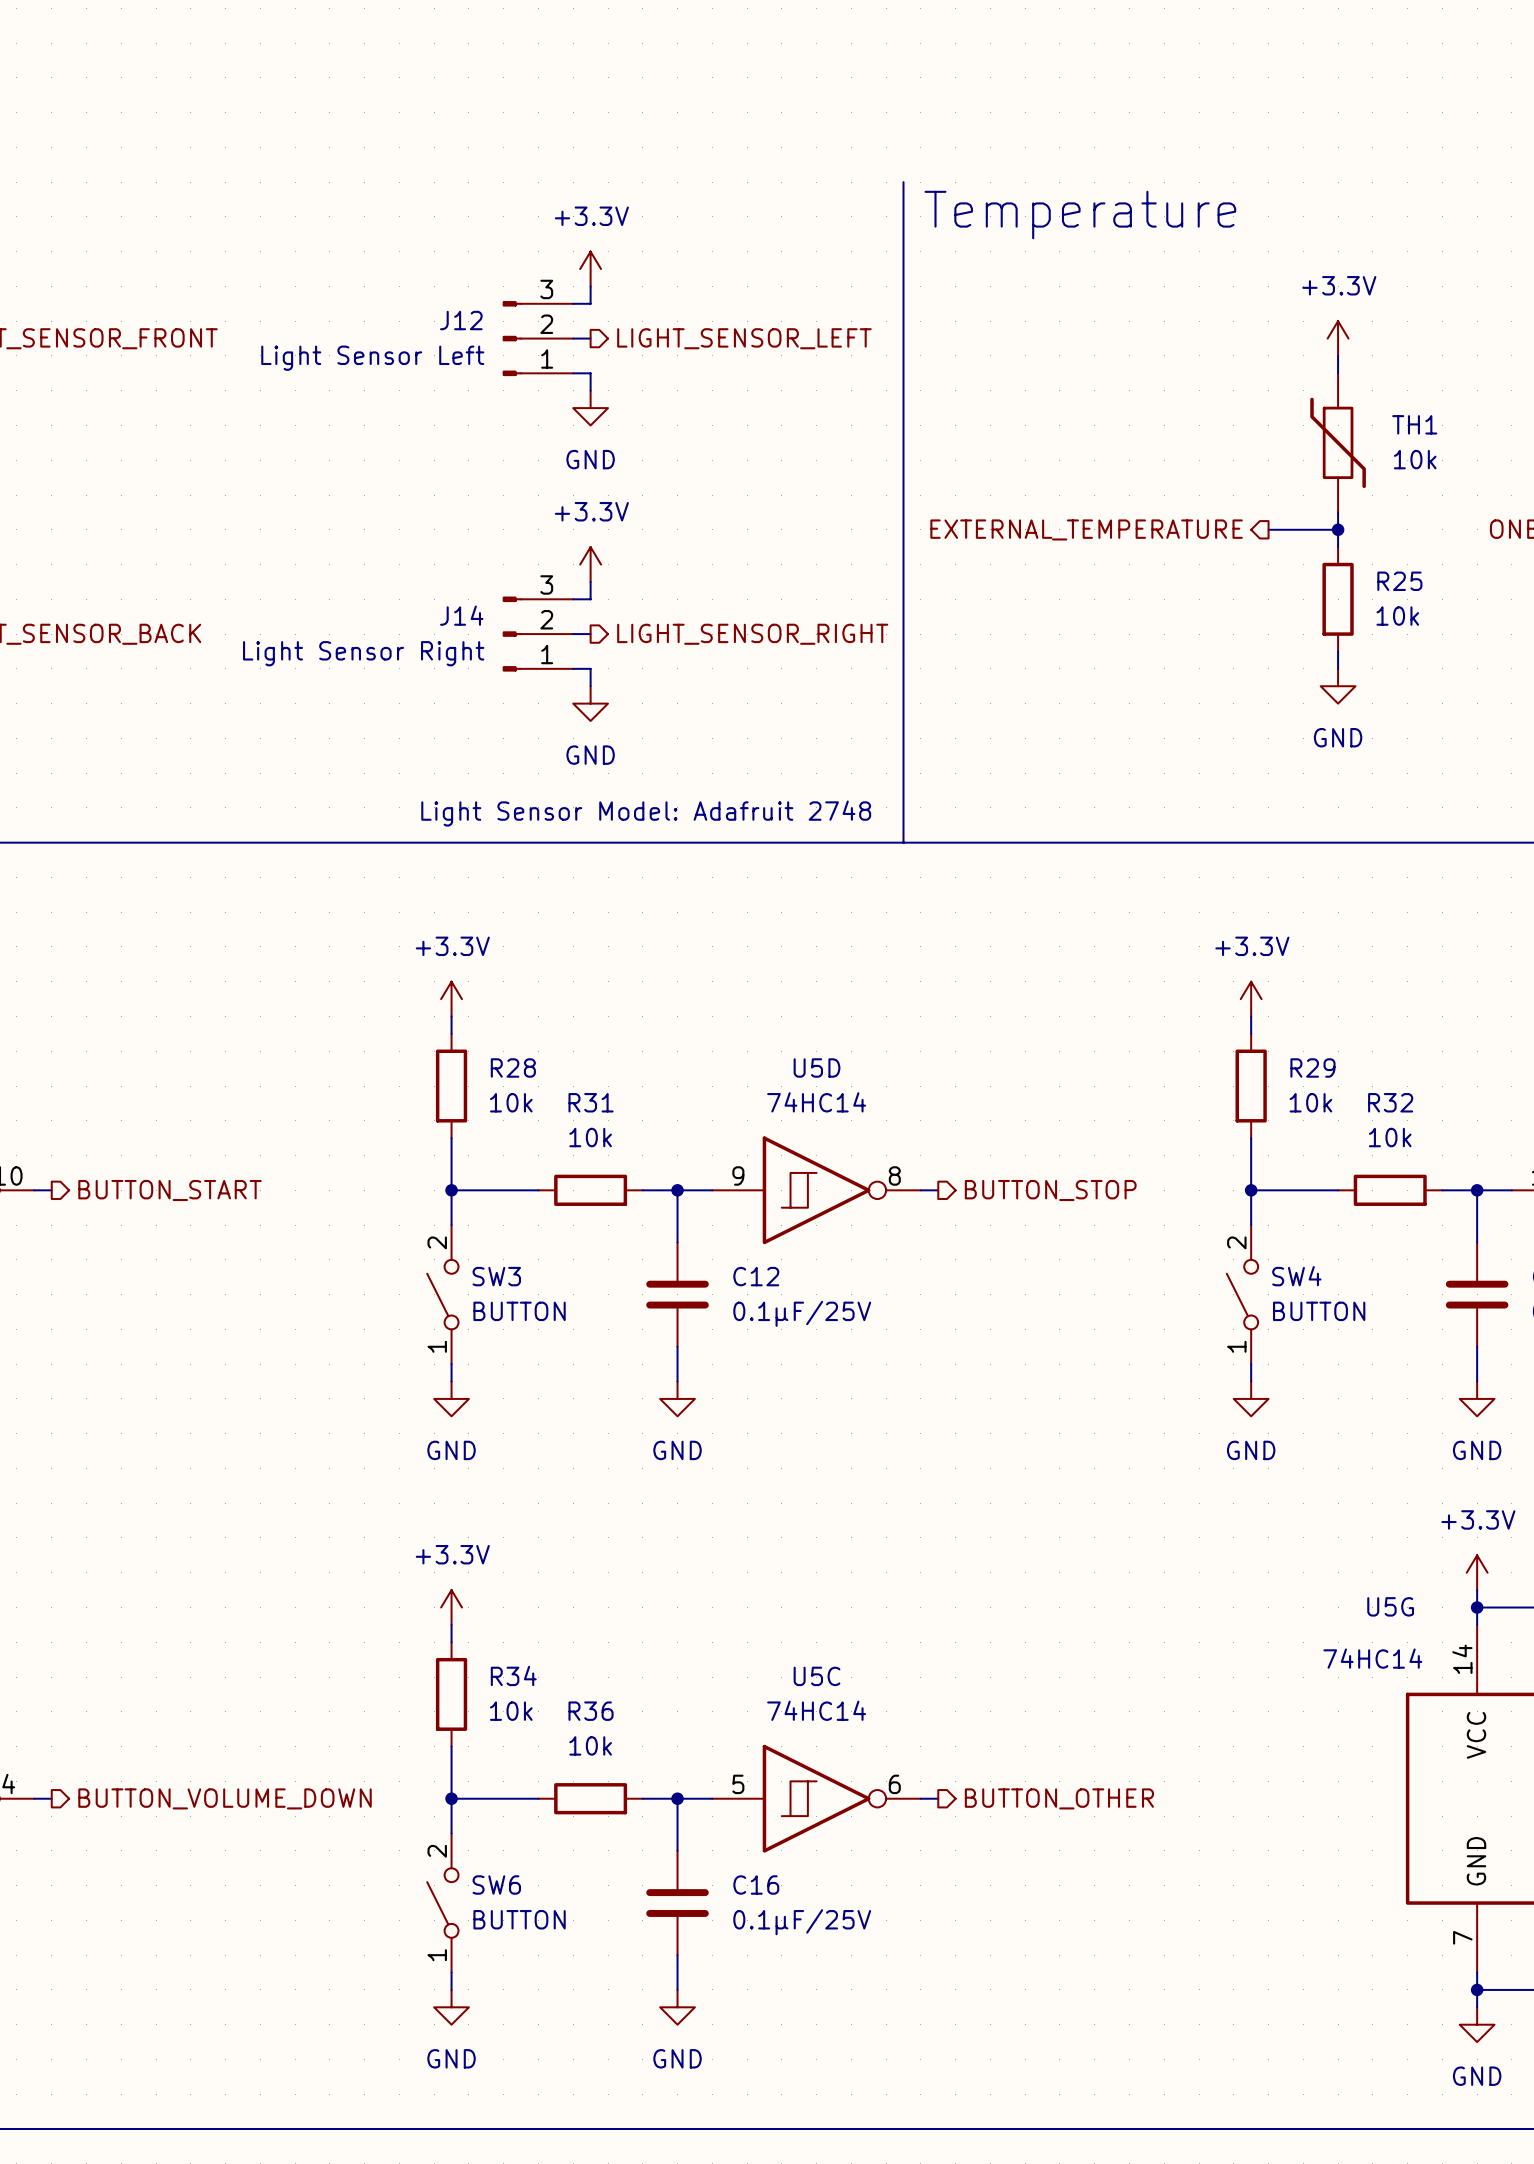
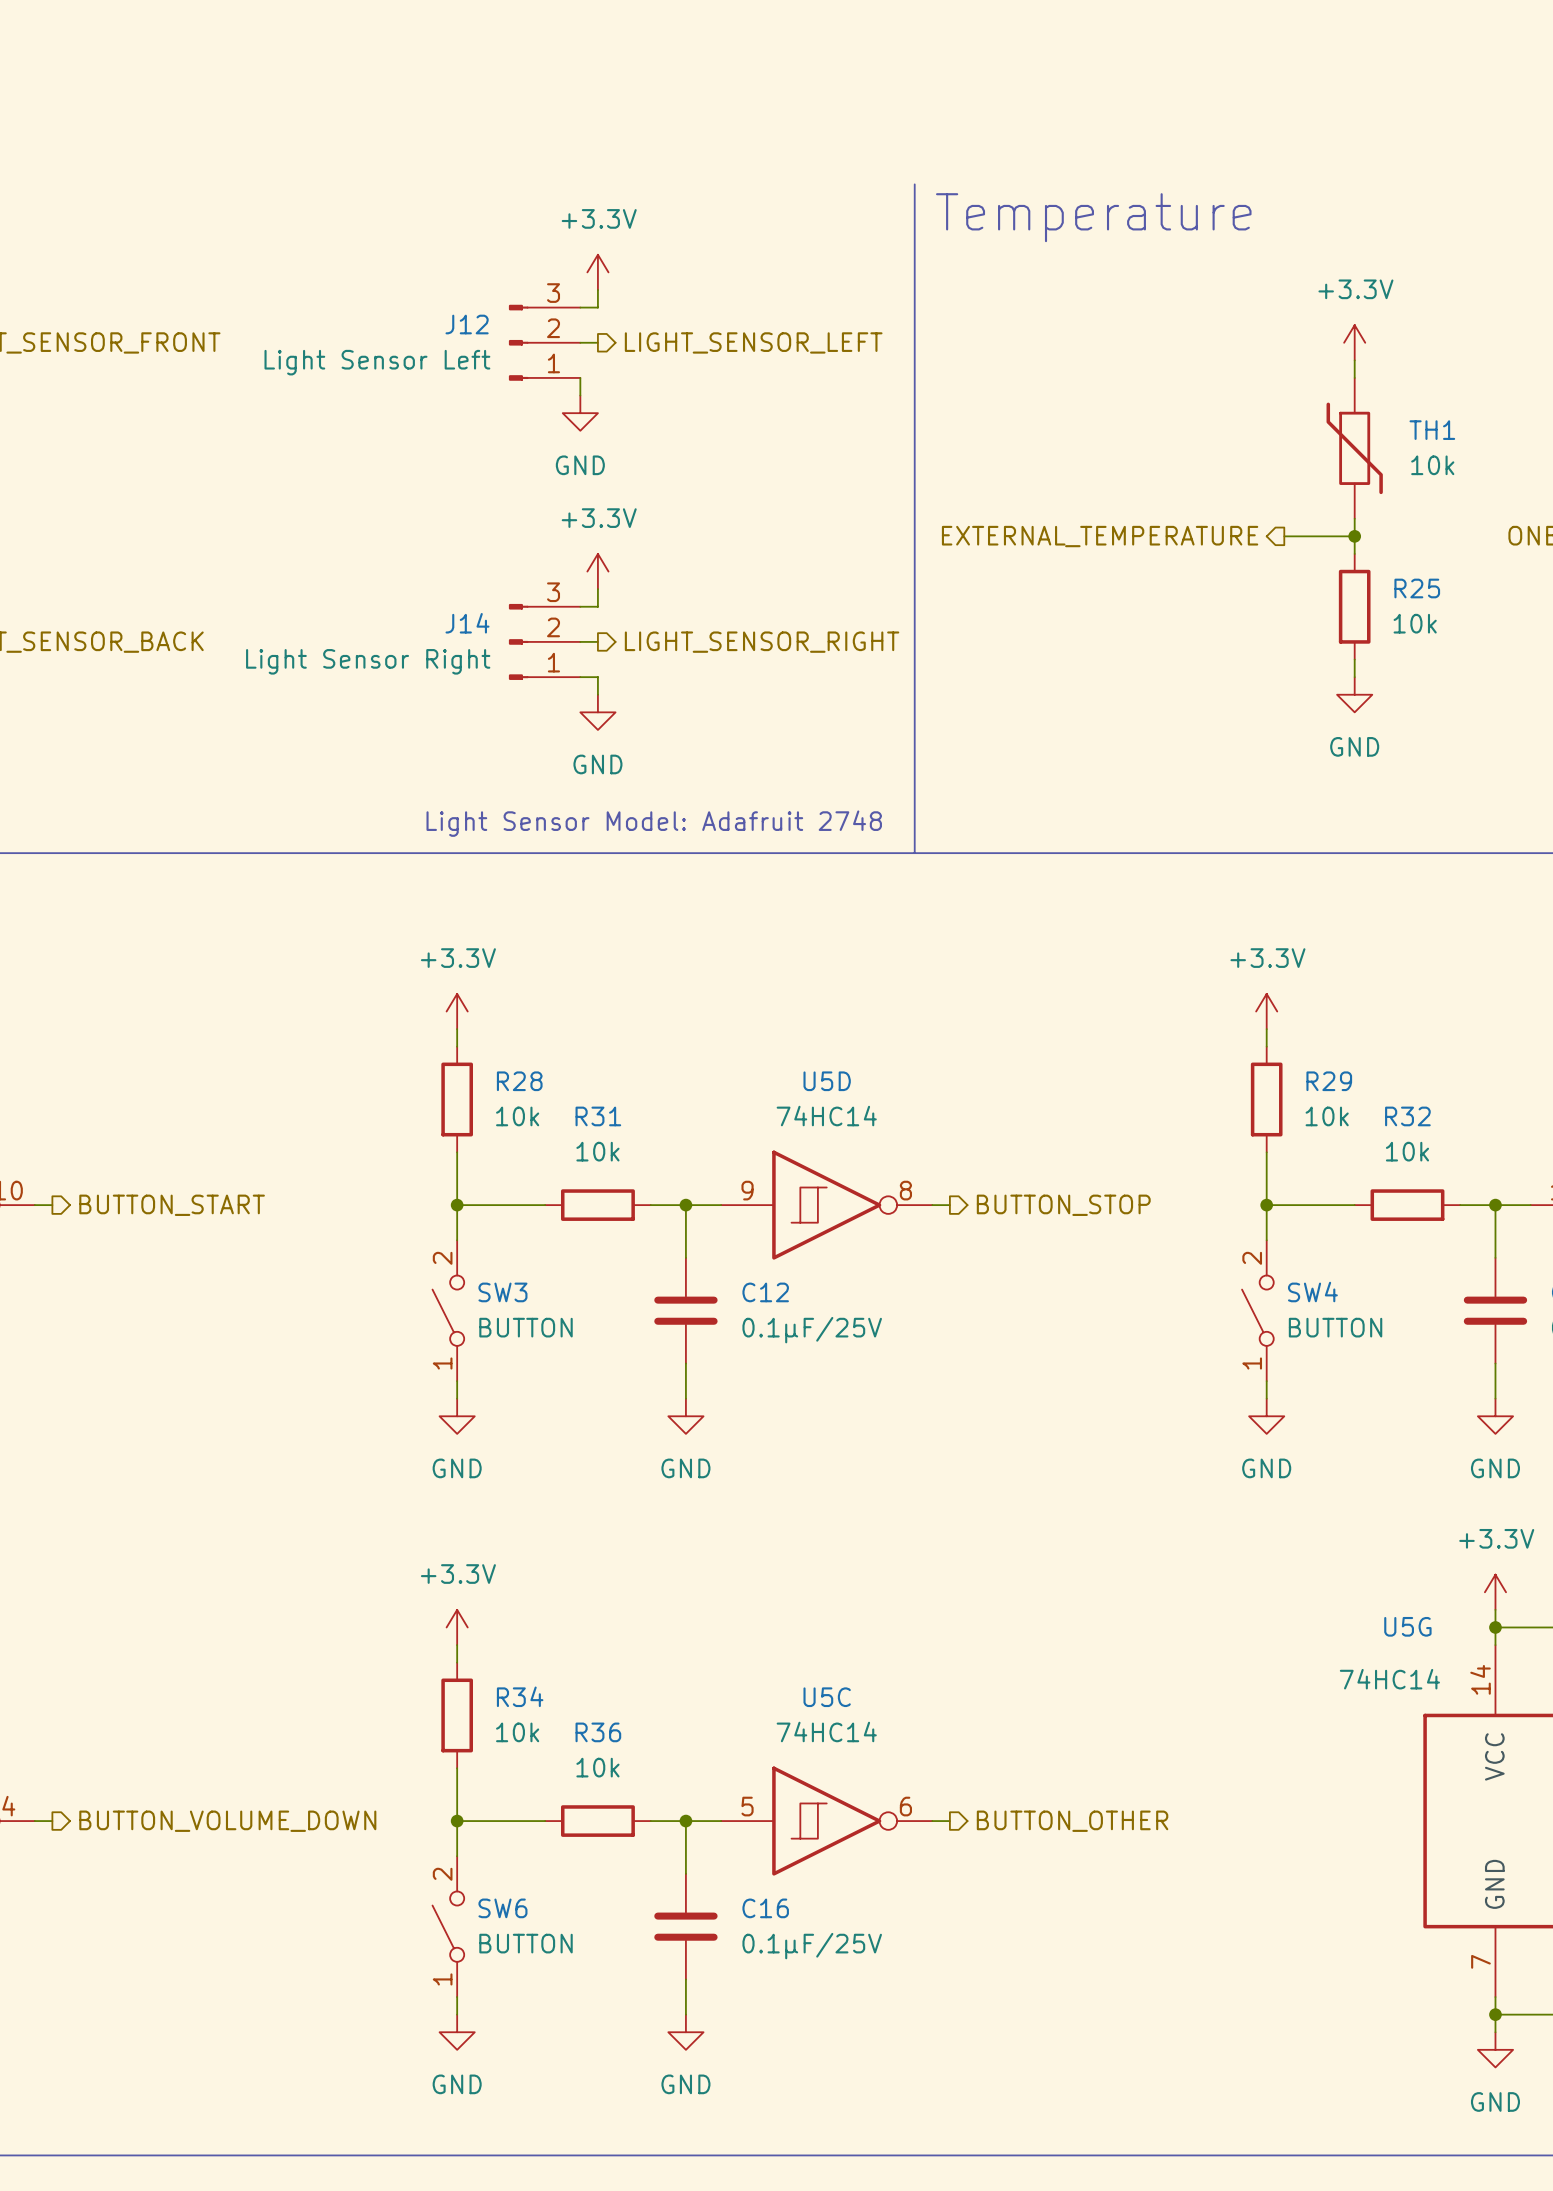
wire: (573, 373) (590, 373) (590, 390) -> (580, 377) (580, 395)
power symbol position: GND (590, 408) -> GND (580, 413)

